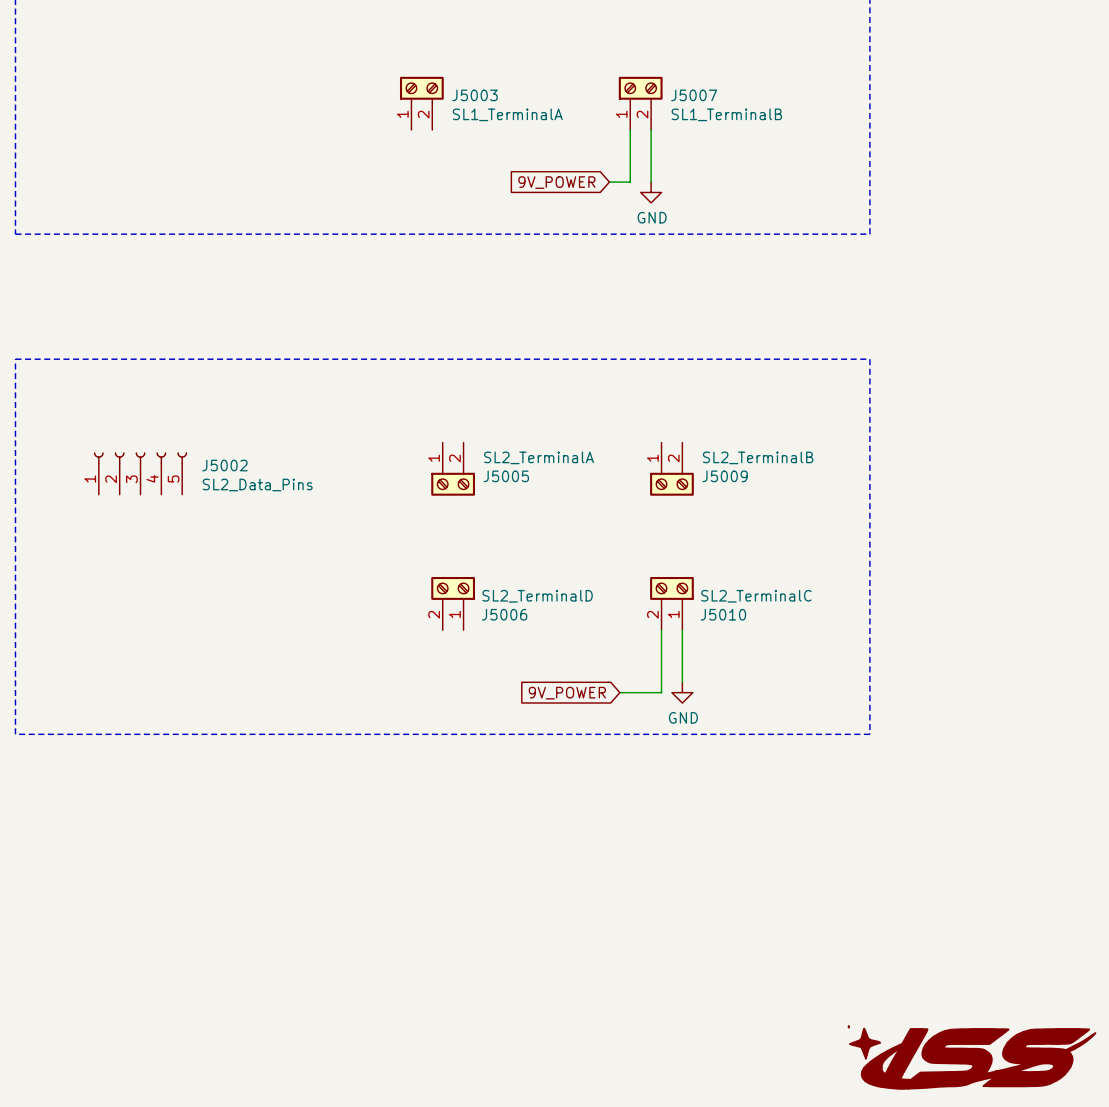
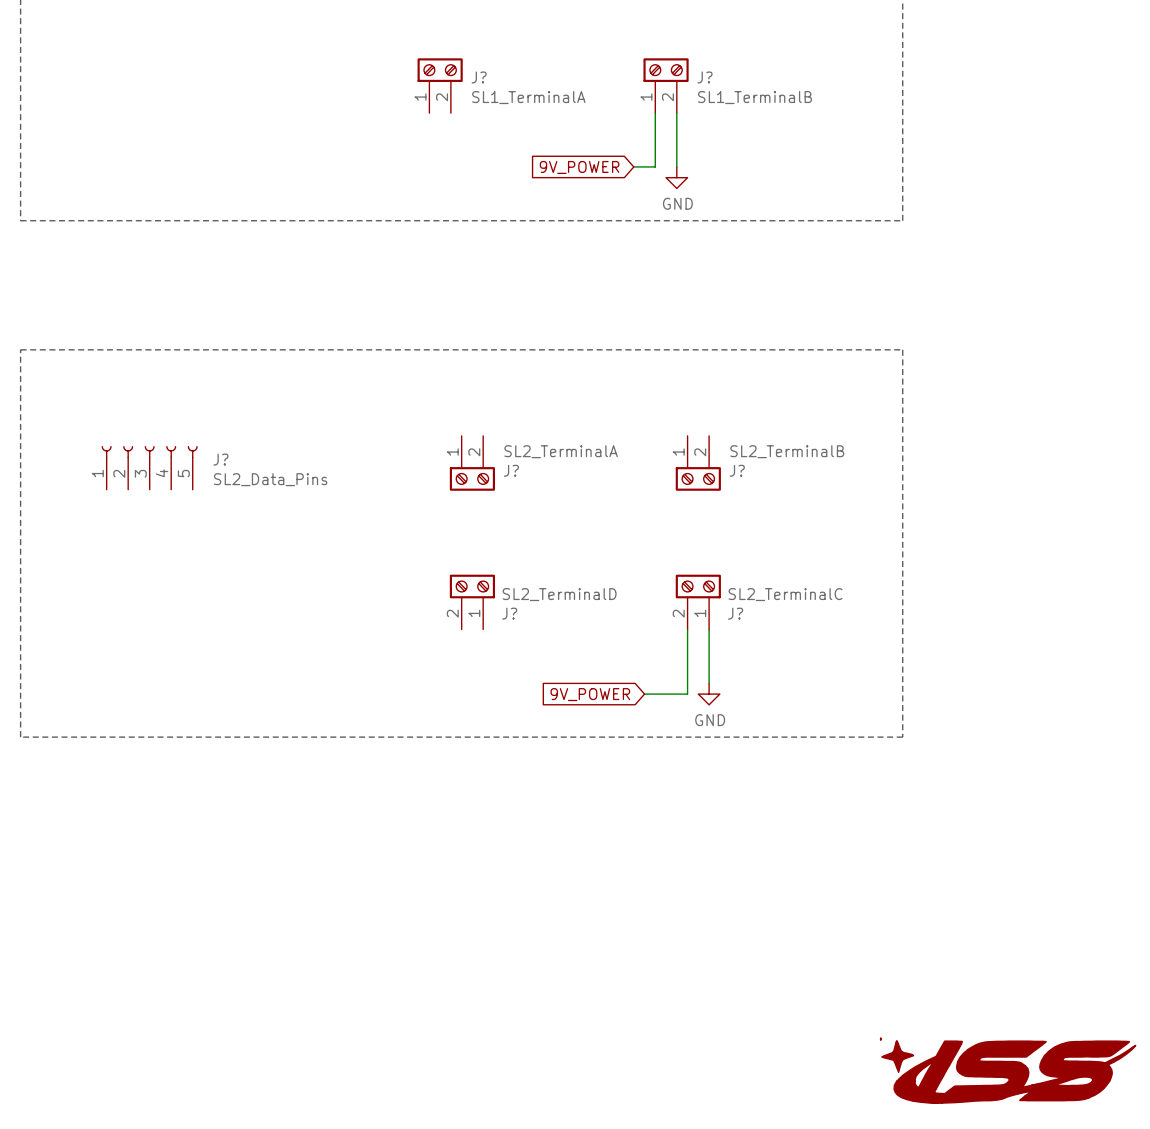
J5003 name: J5003 (475, 95) -> J? (479, 77)
J5007 name: J5007 (694, 95) -> J? (705, 77)
J5002 name: J5002 (224, 465) -> J? (220, 459)
J5005 name: J5005 (506, 476) -> J? (511, 470)
J5009 name: J5009 (725, 476) -> J? (737, 470)
J5006 name: J5006 (504, 614) -> J? (509, 613)
J5010 name: J5010 (723, 614) -> J? (735, 613)

